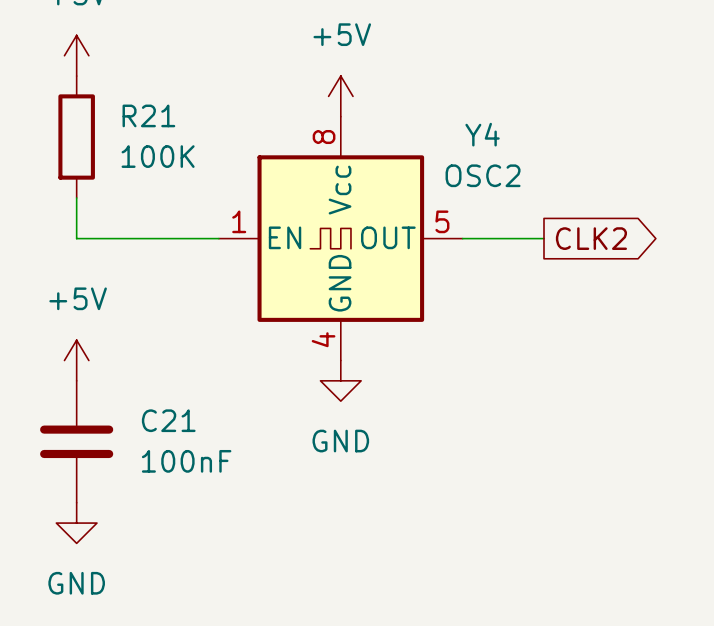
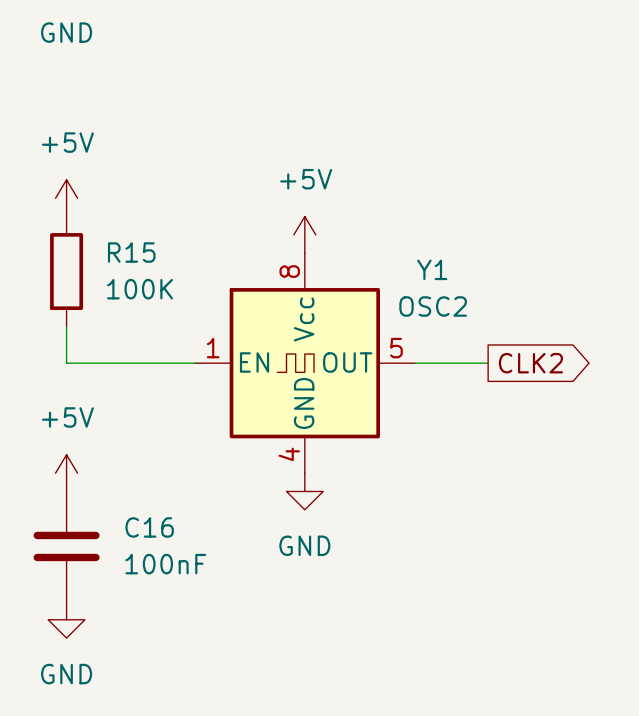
R21 name: R21 (148, 115) -> R15 (131, 252)
Y4 name: Y4 (482, 134) -> Y1 (432, 269)
C21 name: C21 (168, 420) -> C16 (149, 527)

